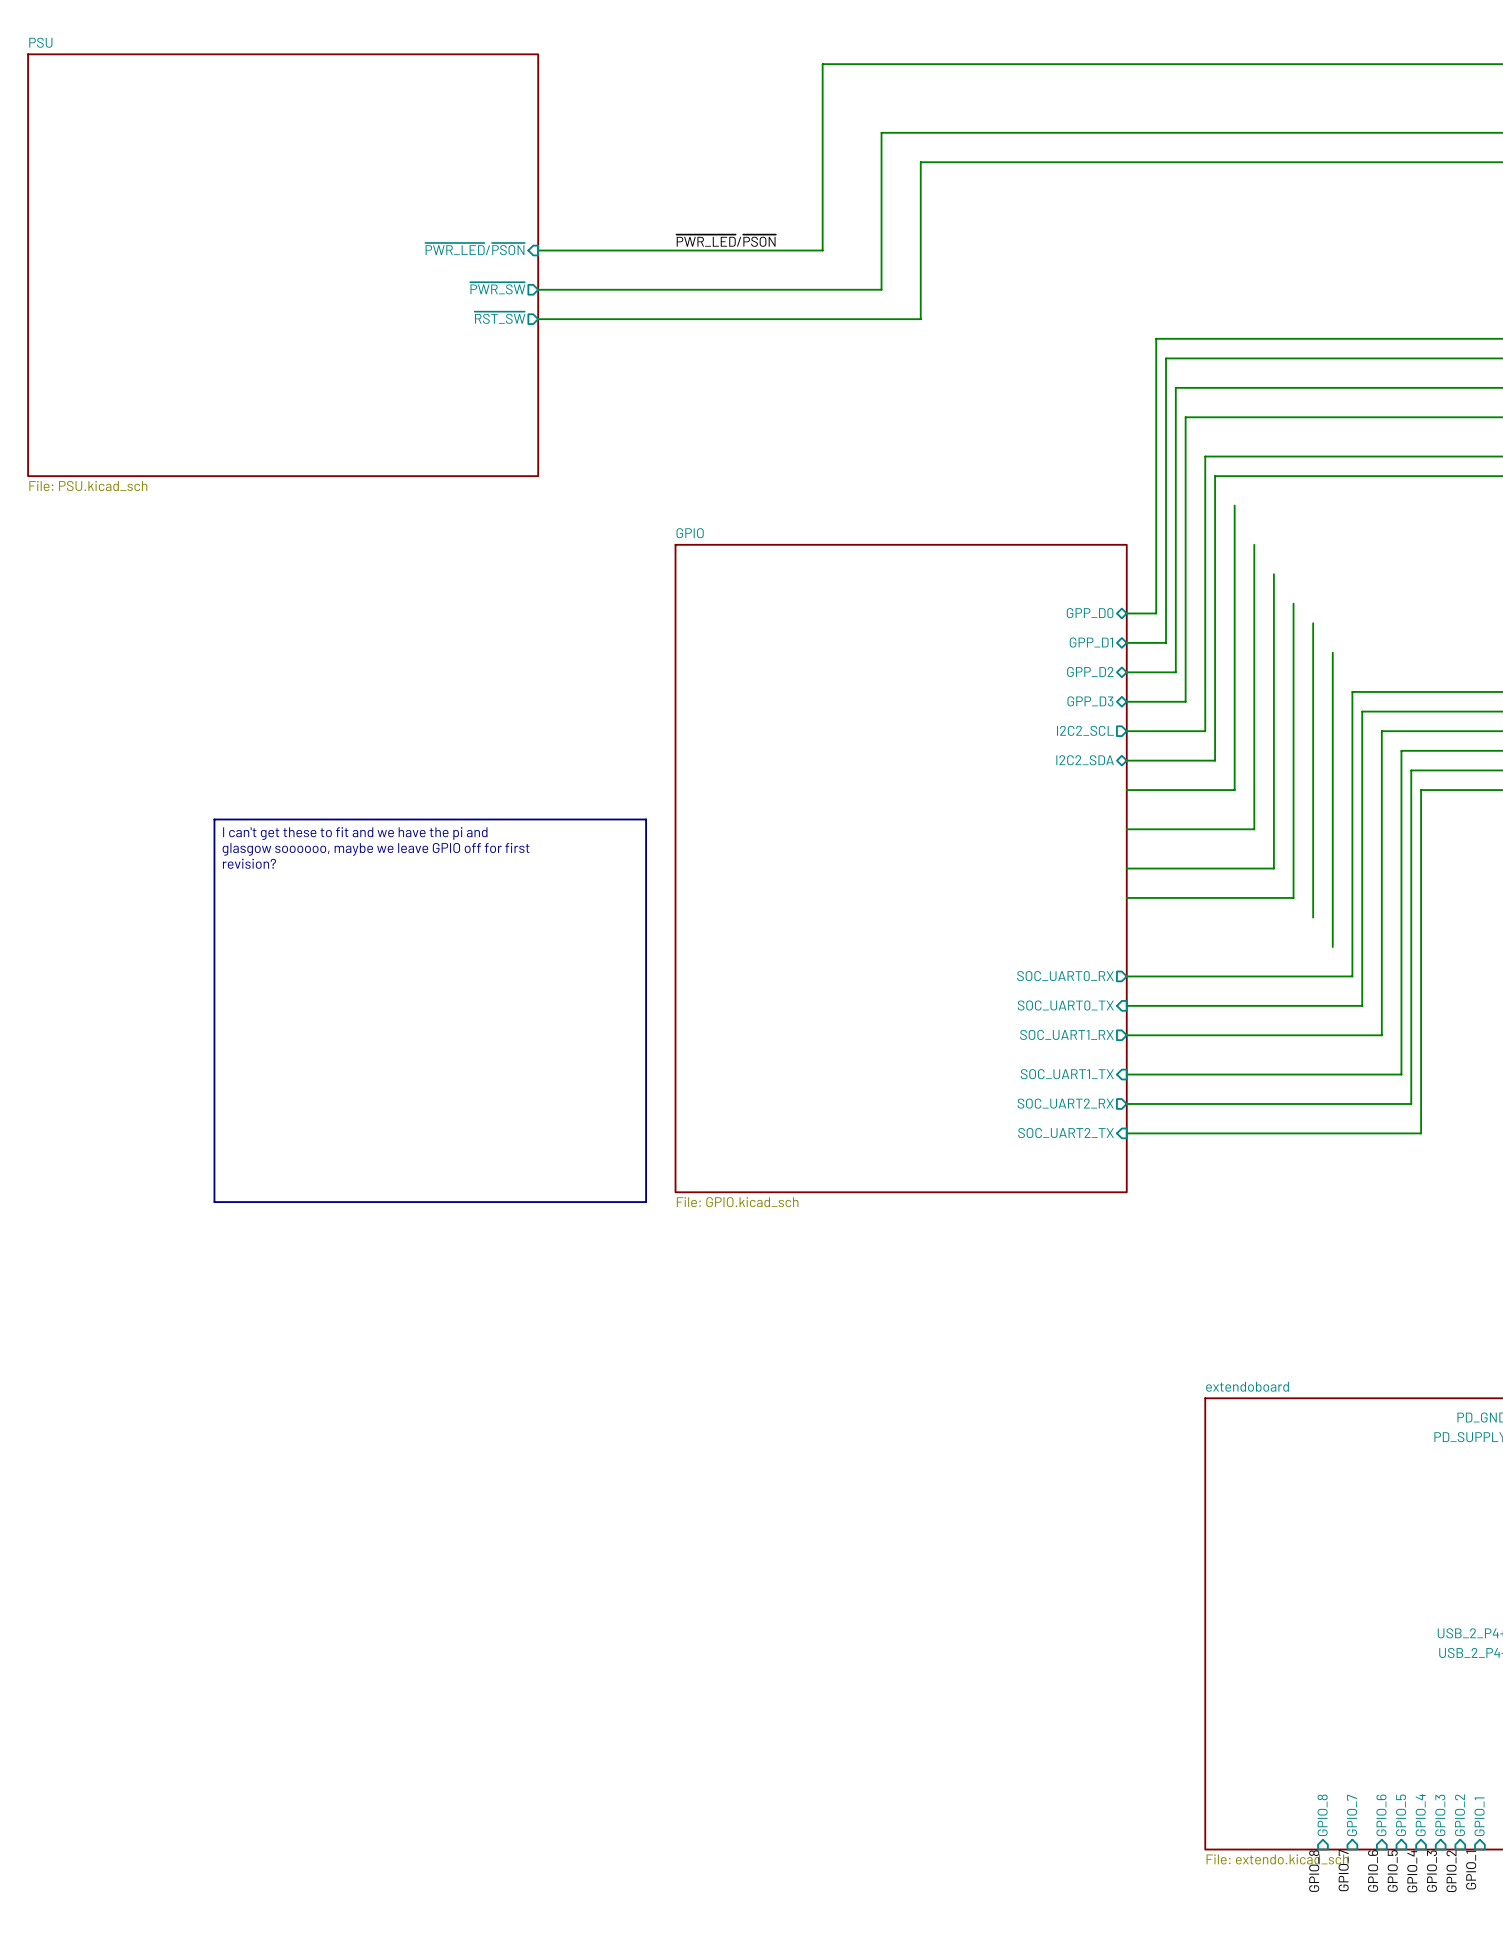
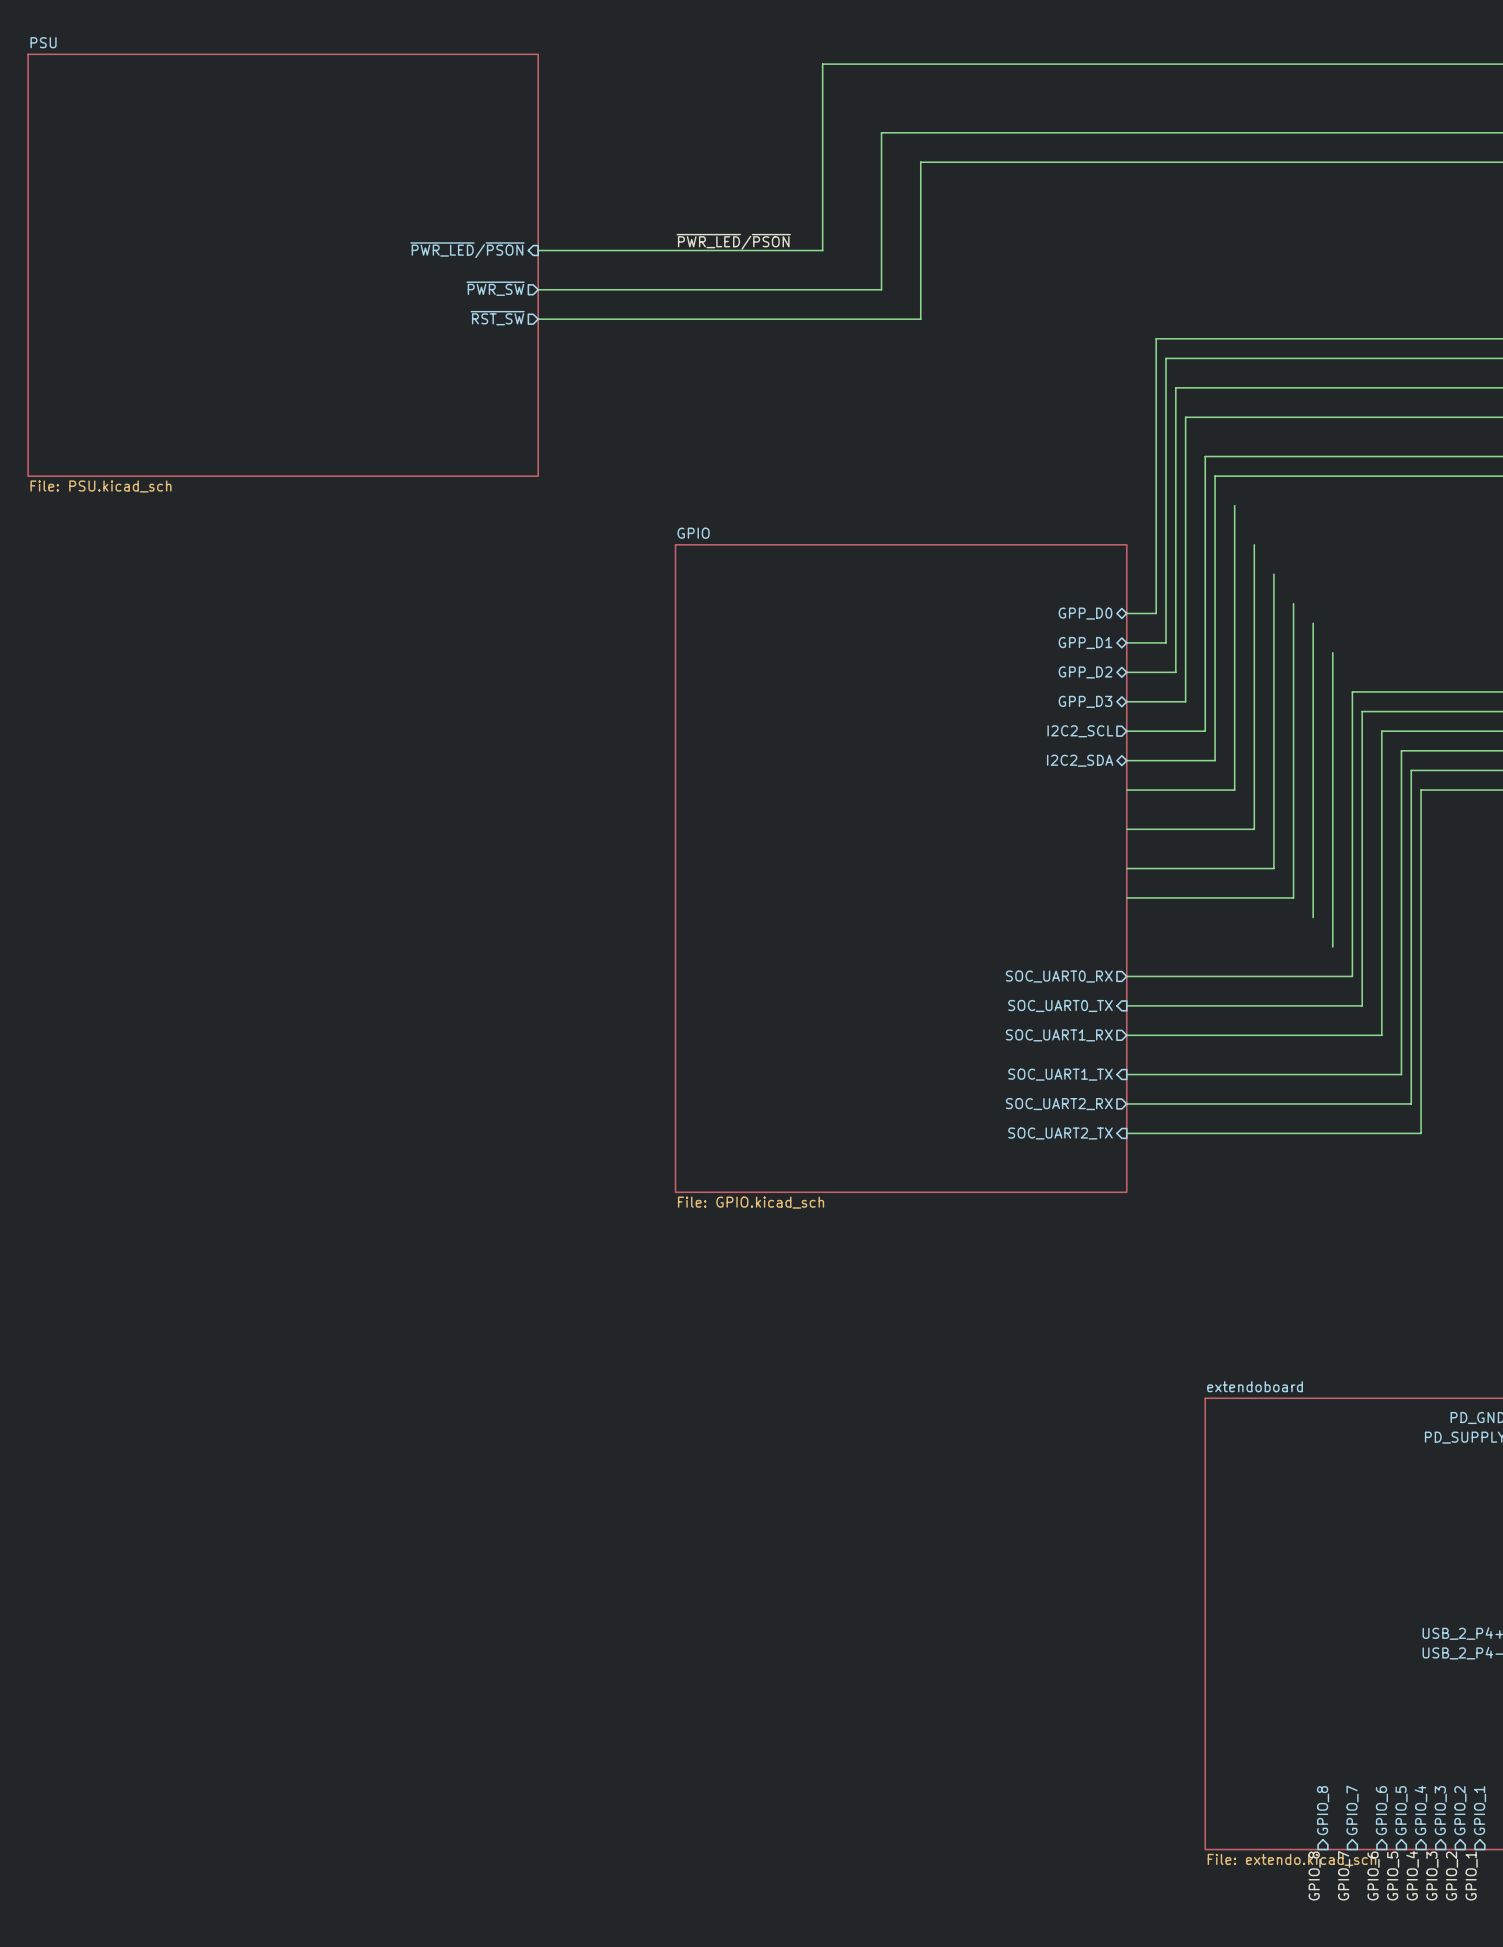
line: (214, 819) (646, 819) (646, 1202) (214, 1202) (214, 819) -> none
text: I can't get these to fit and we have the pi and (355, 833) -> none
text: glasgow soooooo, maybe we leave GPIO off for first (376, 849) -> none
text: revision? (249, 863) -> none

